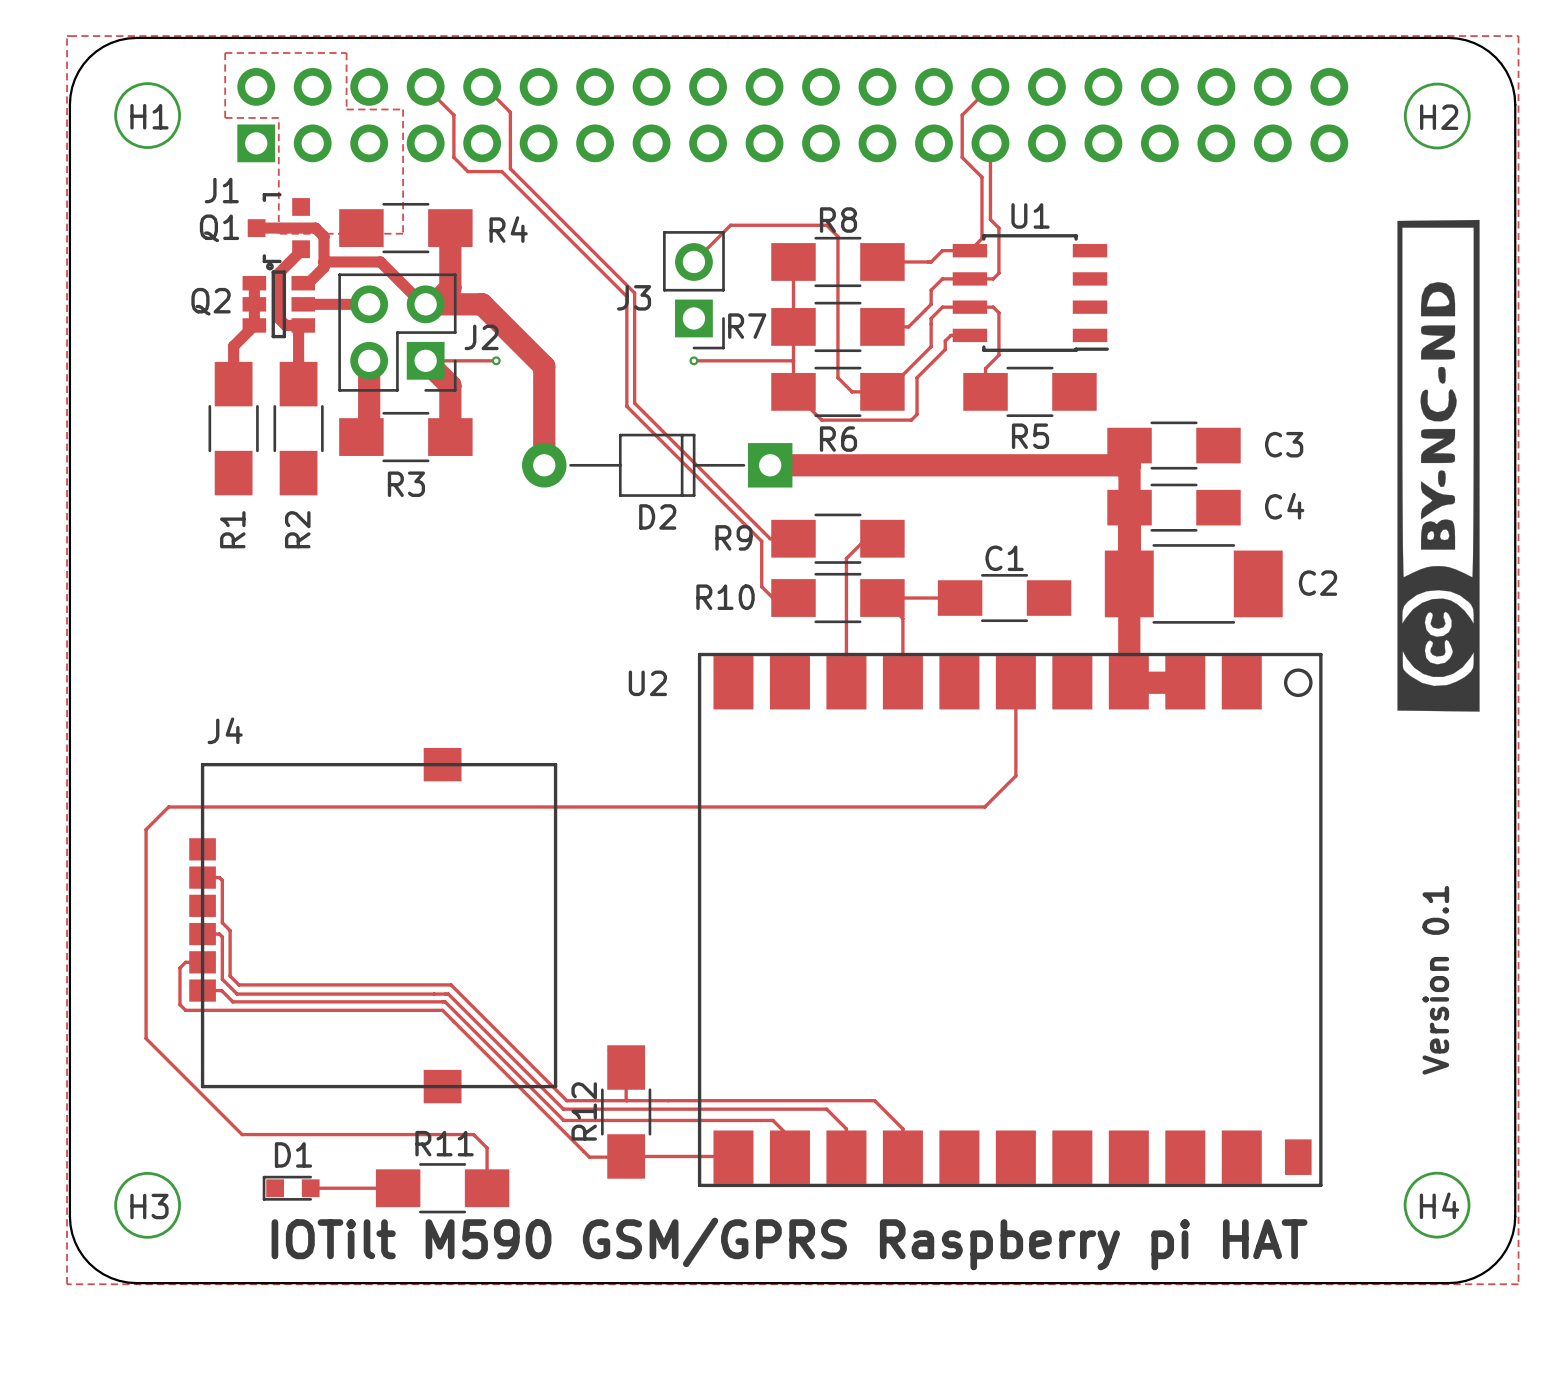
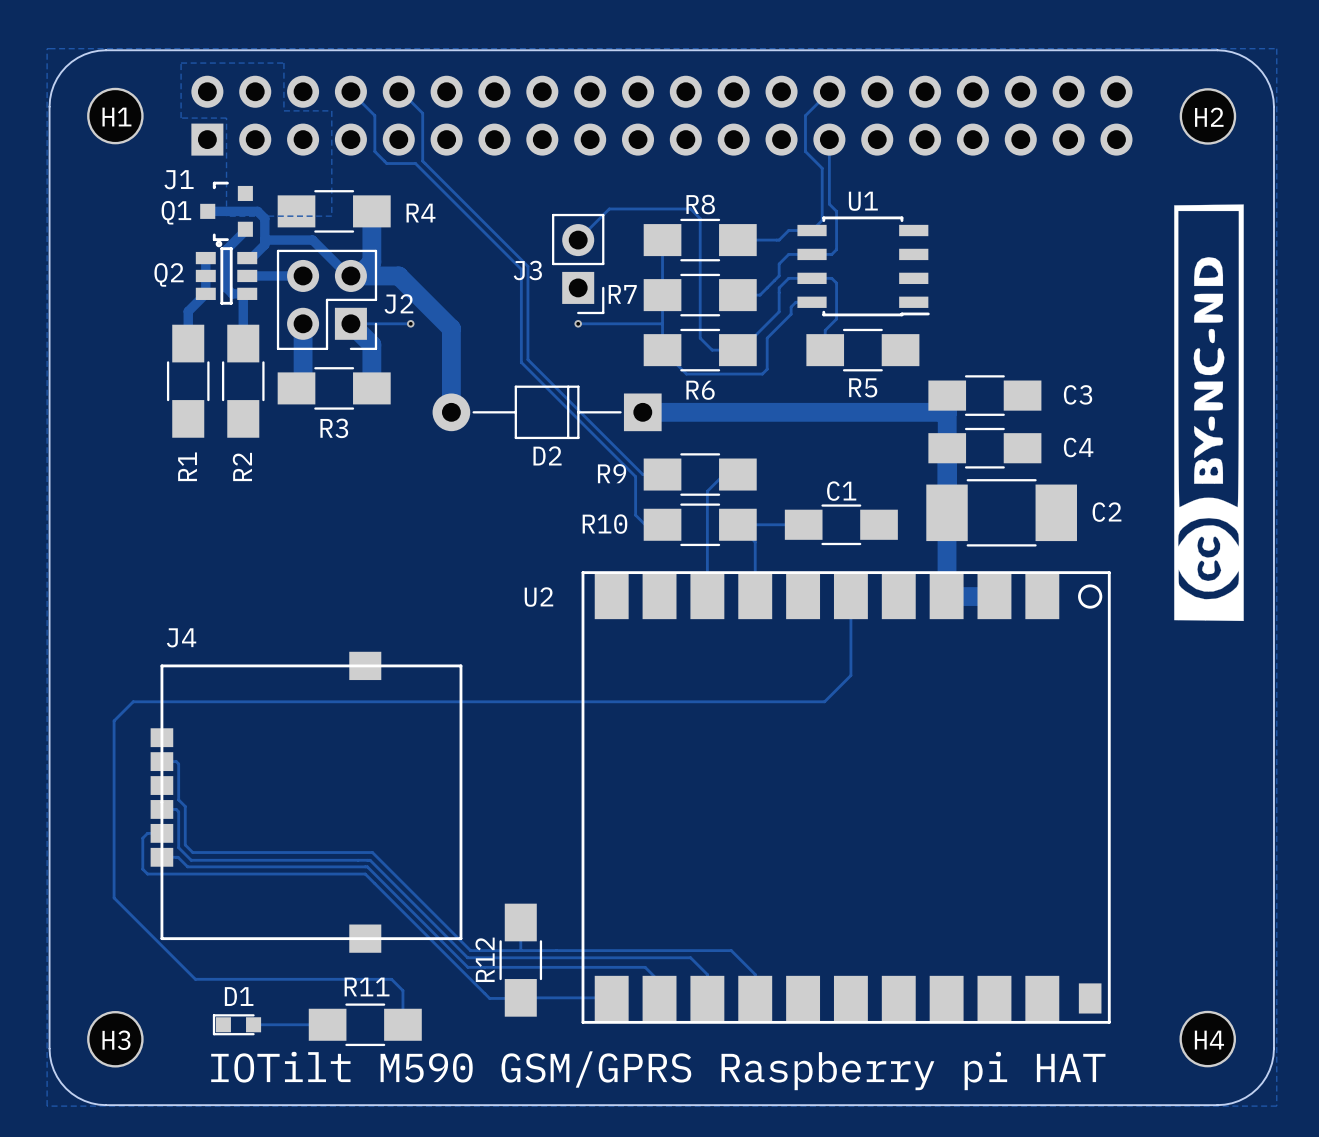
text: Version 0.1 (1435, 980) -> none

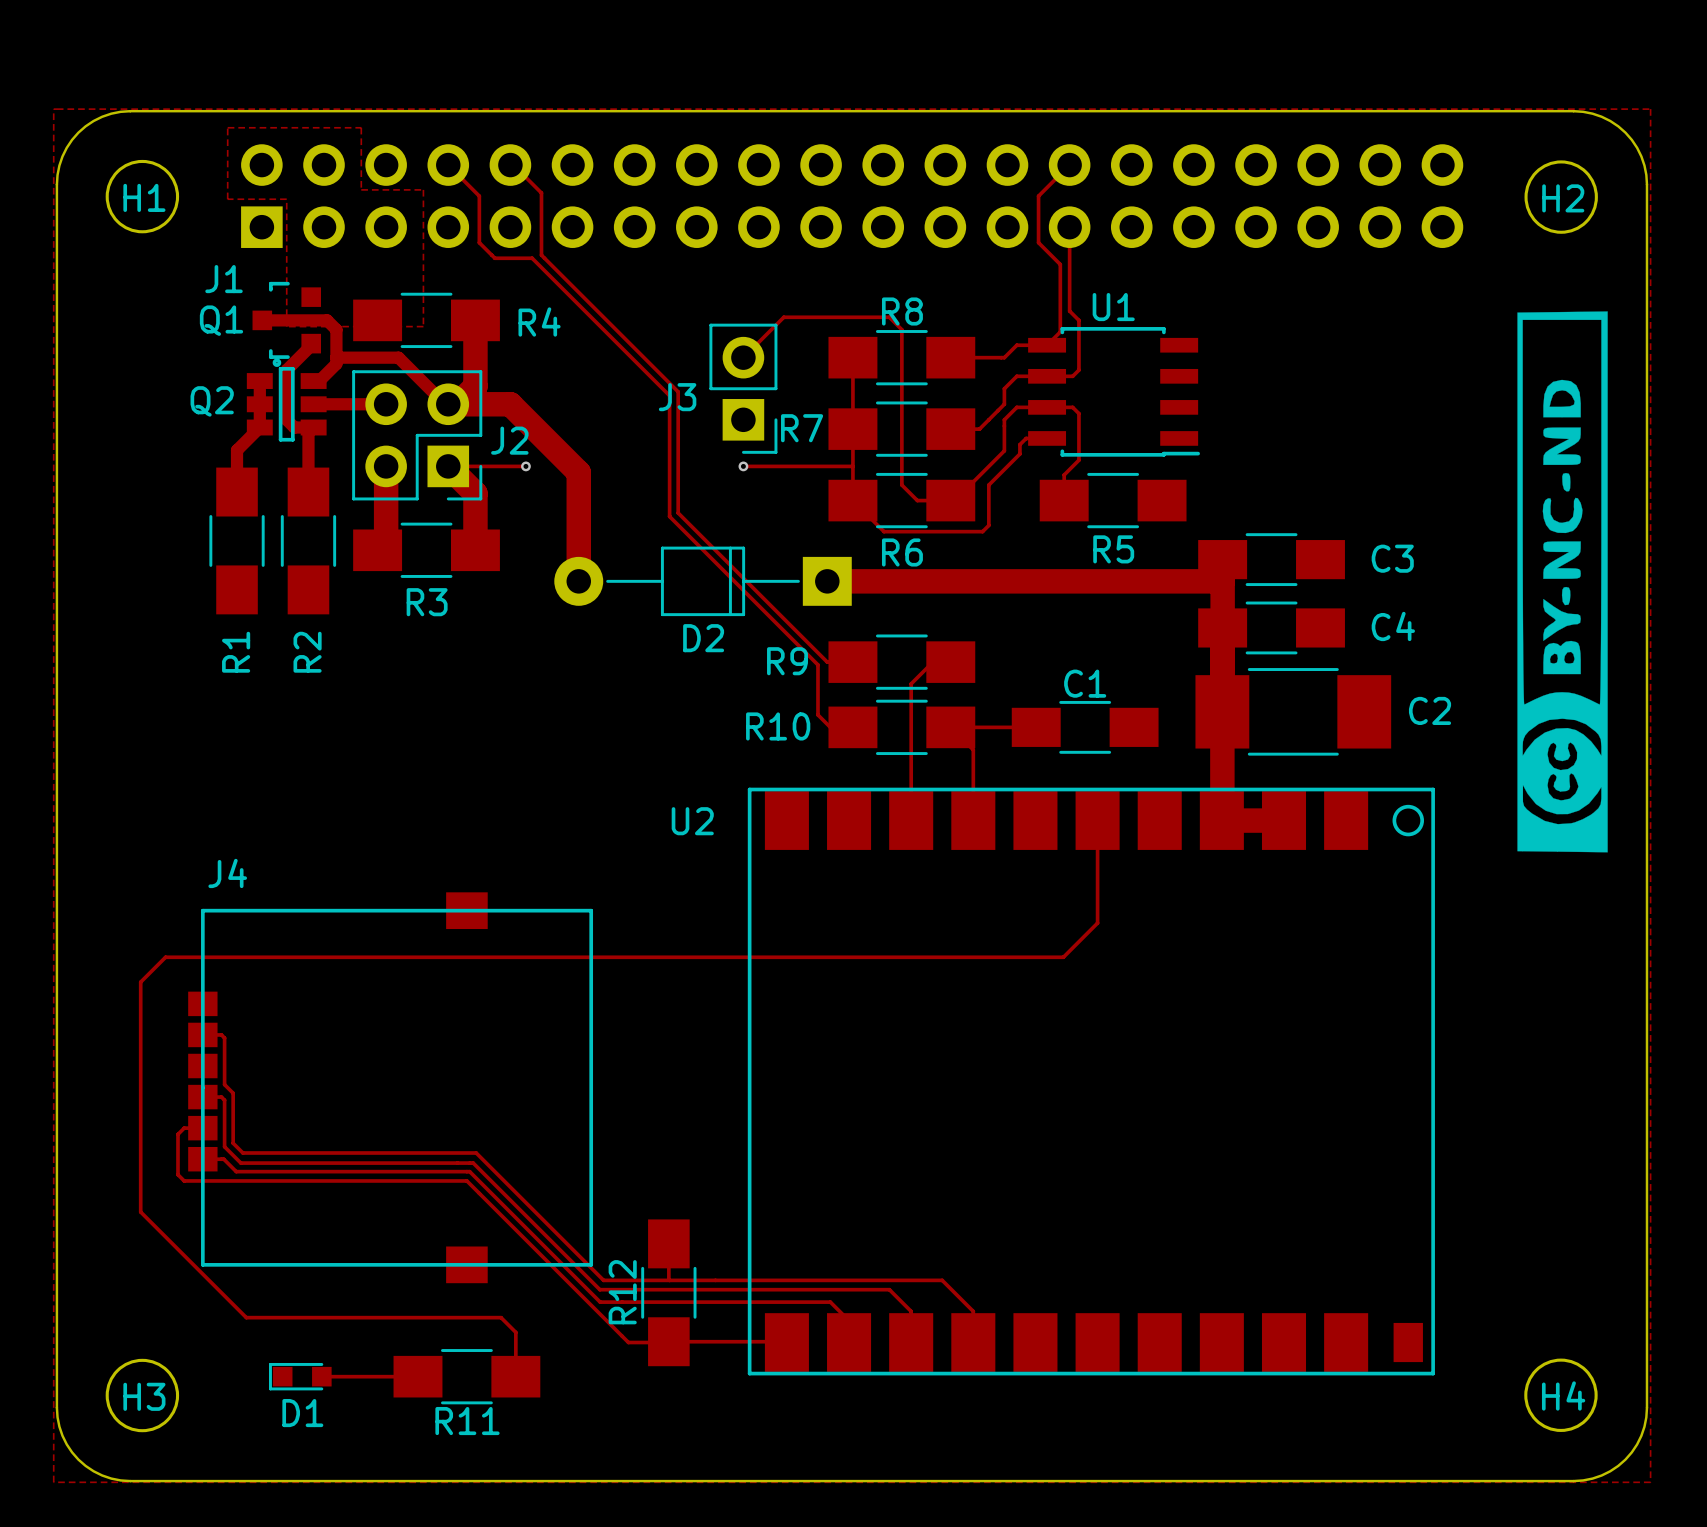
R11 name position: R11 (367, 986) -> R11 (467, 1421)
D1 name position: D1 (239, 996) -> D1 (302, 1413)
text: IOTilt M590 GSM/GPRS Raspberry pi HAT (658, 1070) -> none

